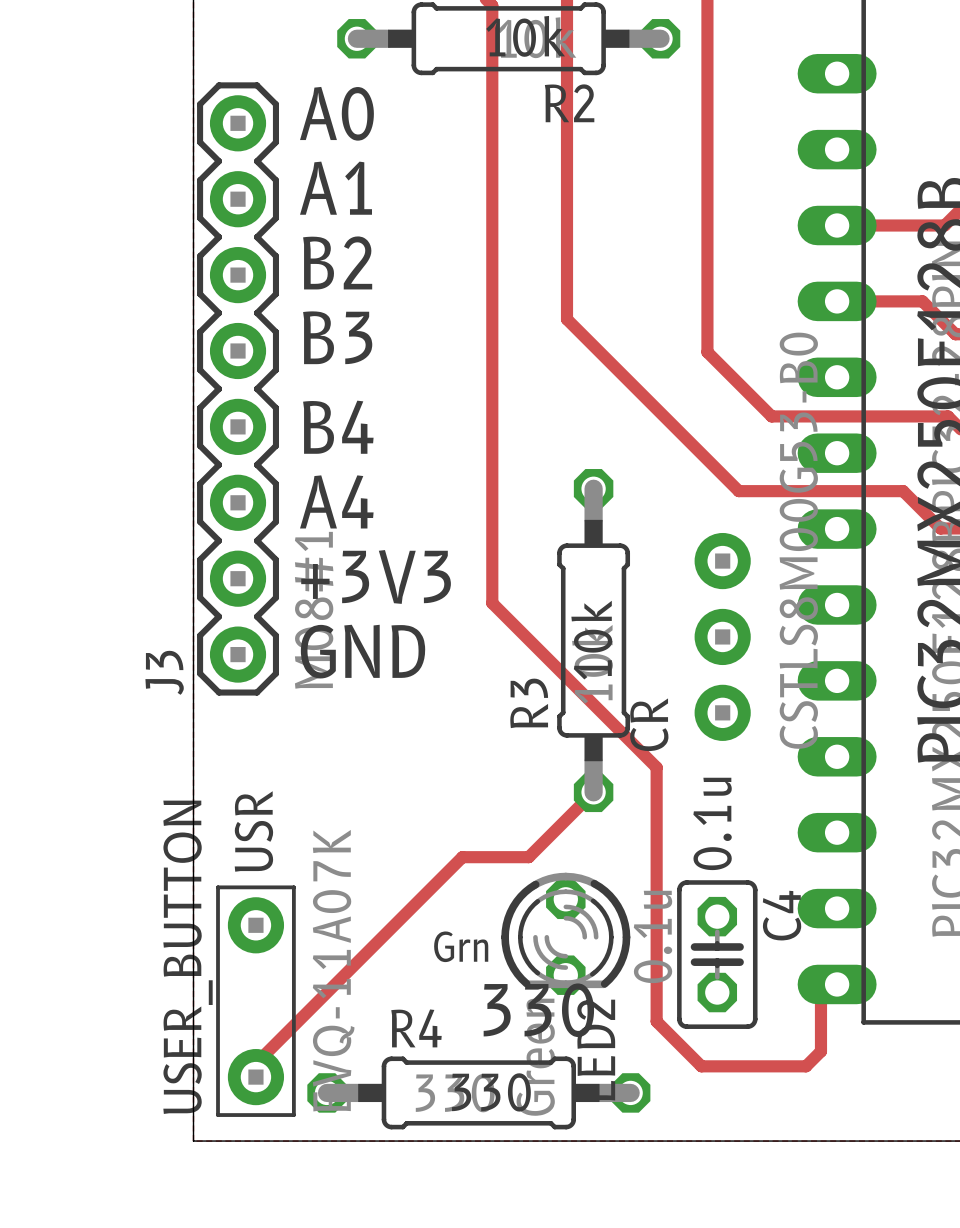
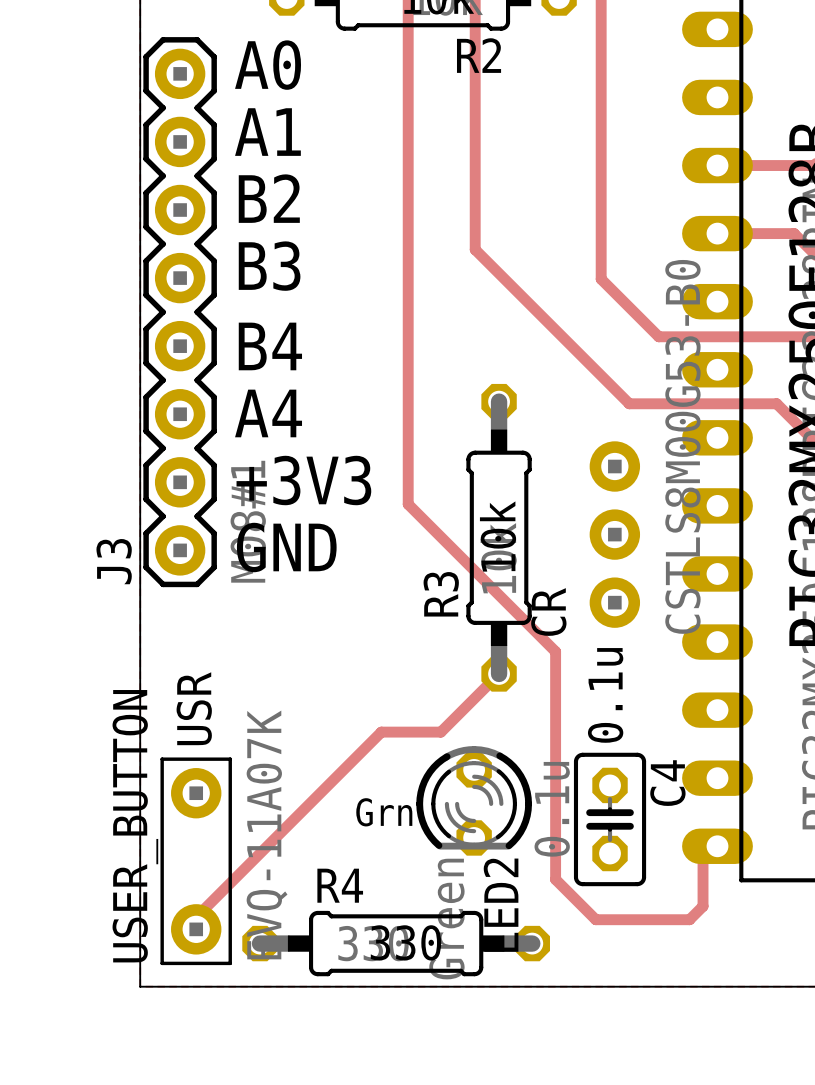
text: 330 (538, 1010) -> none

